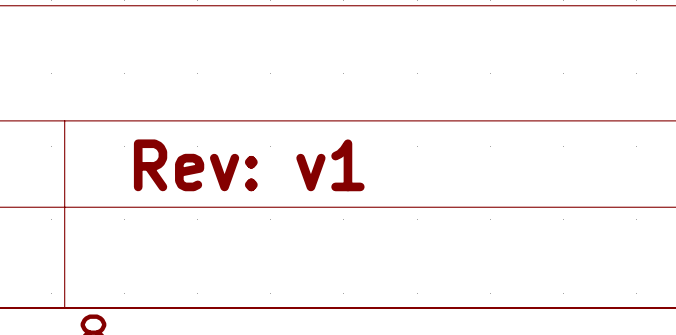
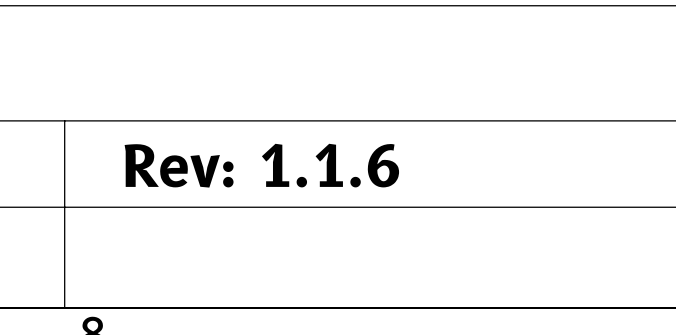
title block: Rev: v1 (249, 165) -> Rev: 1.1.6 (261, 165)

